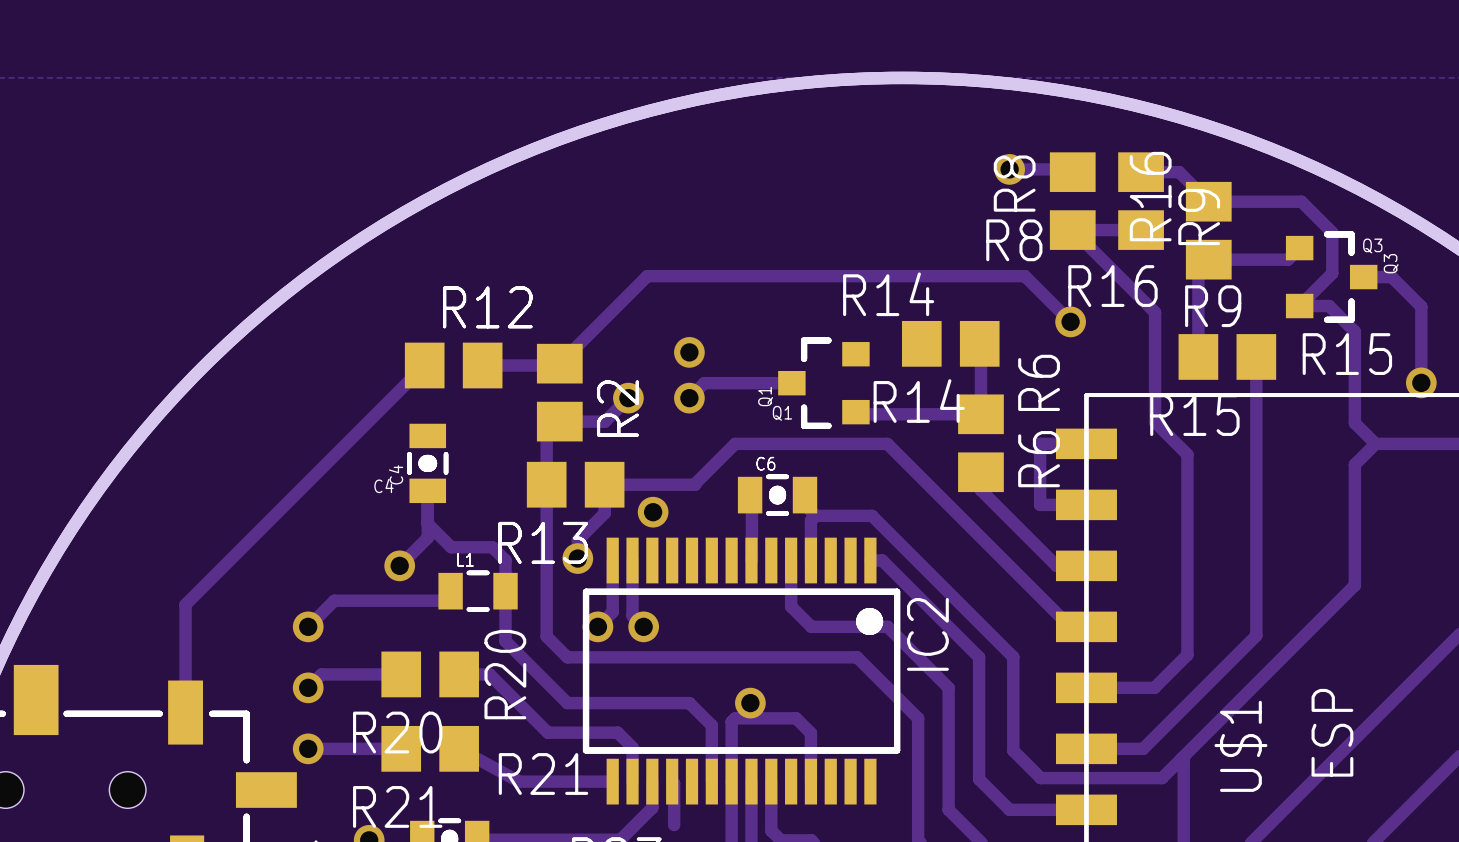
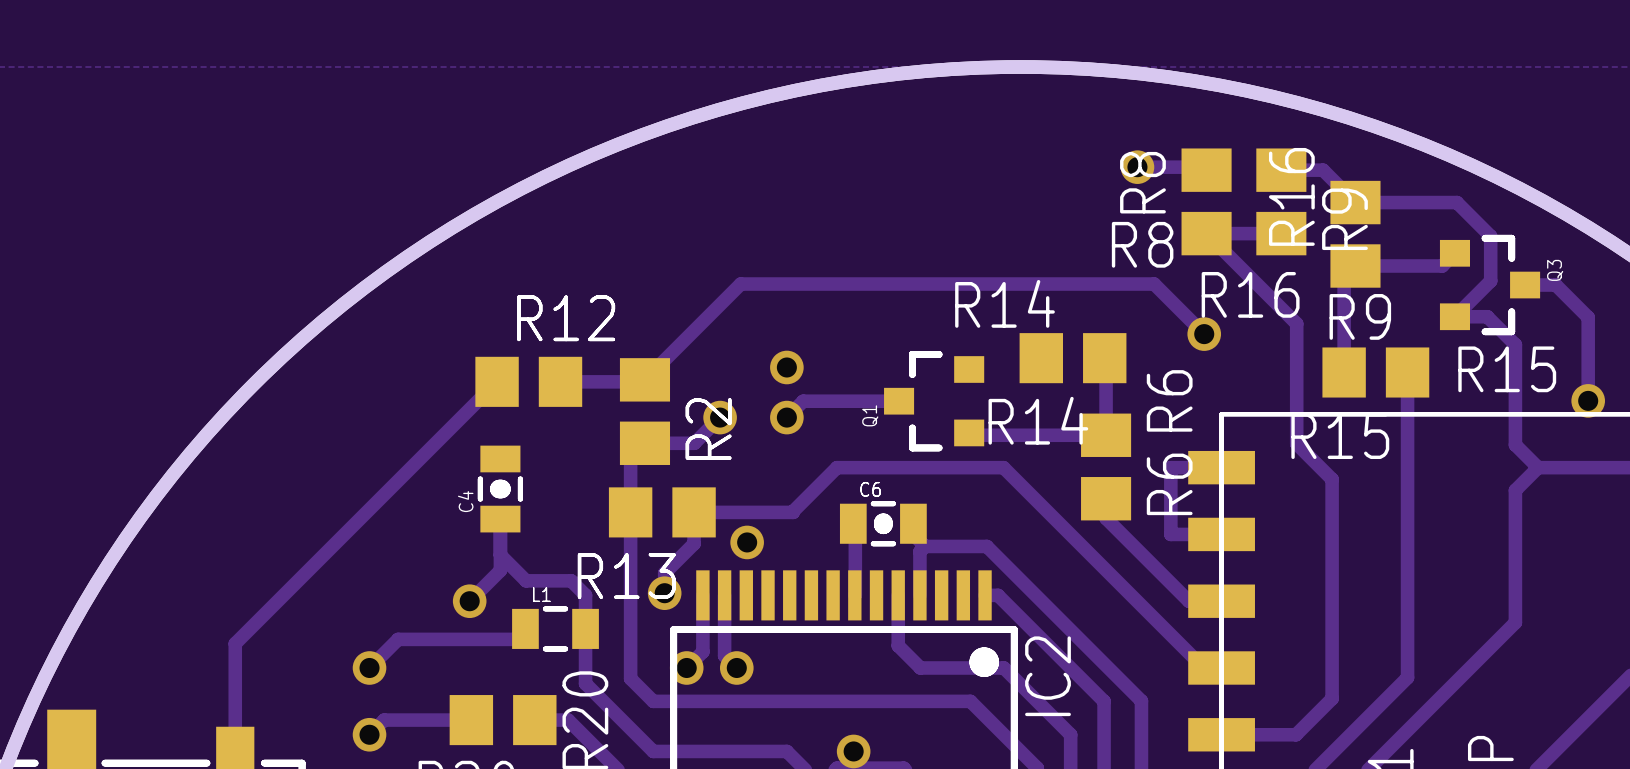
text: Q3 (1372, 245) -> none
text: Q1 (782, 413) -> none
text: C4 (383, 486) -> none

